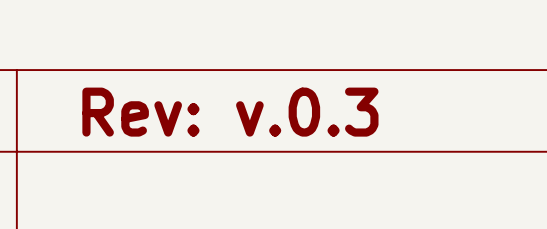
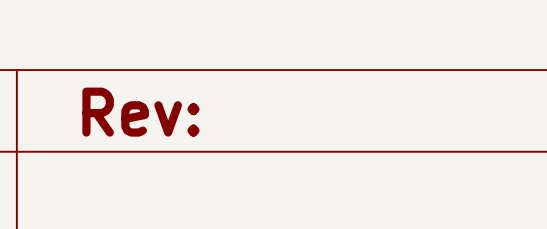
title block: Rev: v.0.3 (230, 112) -> Rev: (140, 112)

